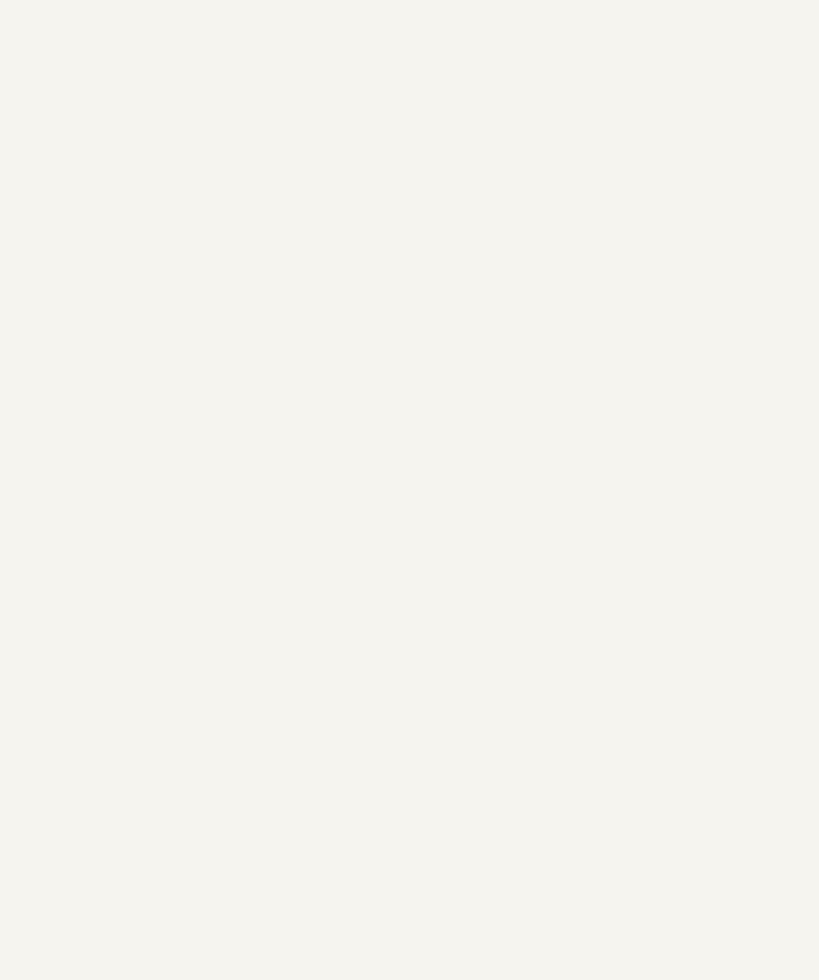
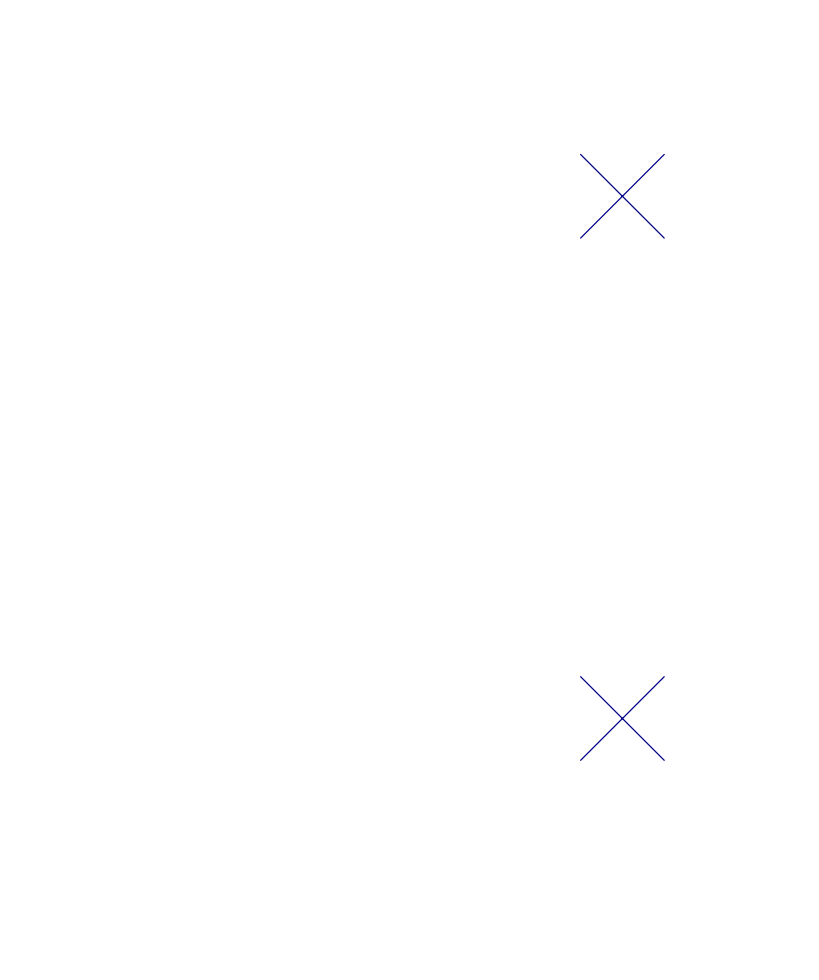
no-connect mark: none -> (622, 196)
no-connect mark: none -> (622, 718)

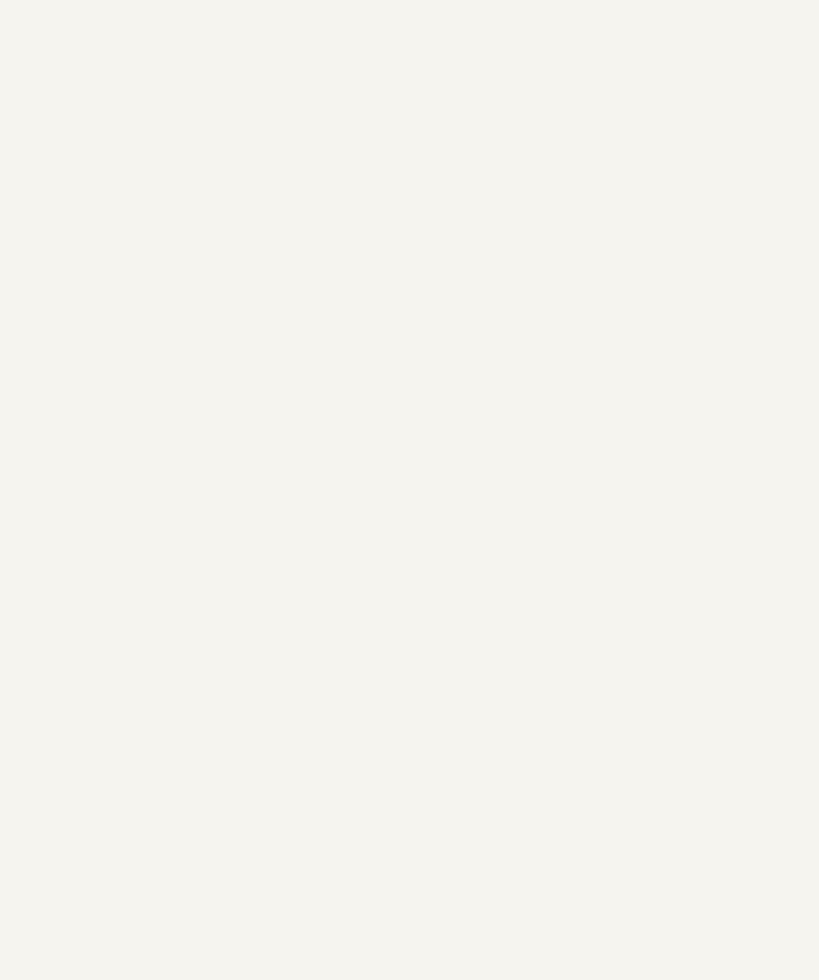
no-connect mark: (622, 196) -> none
no-connect mark: (622, 718) -> none

